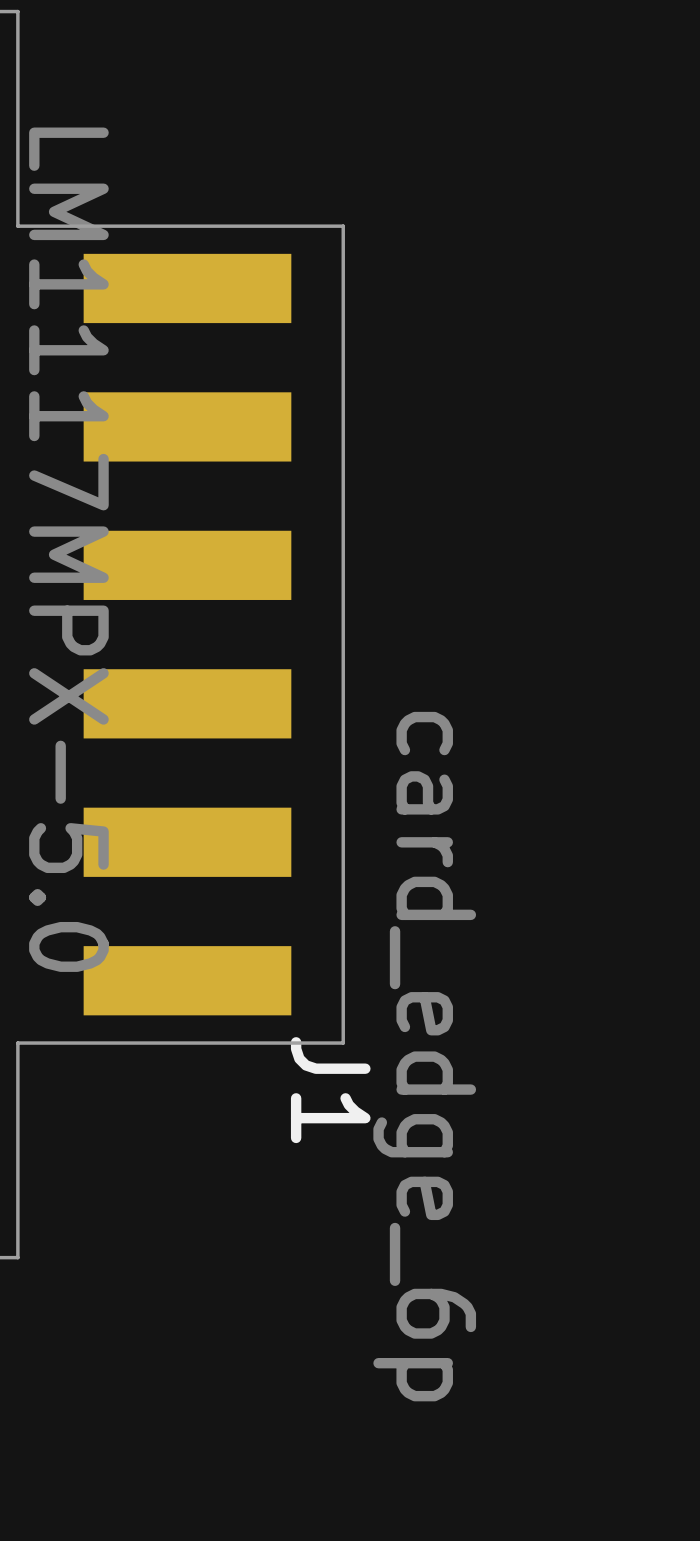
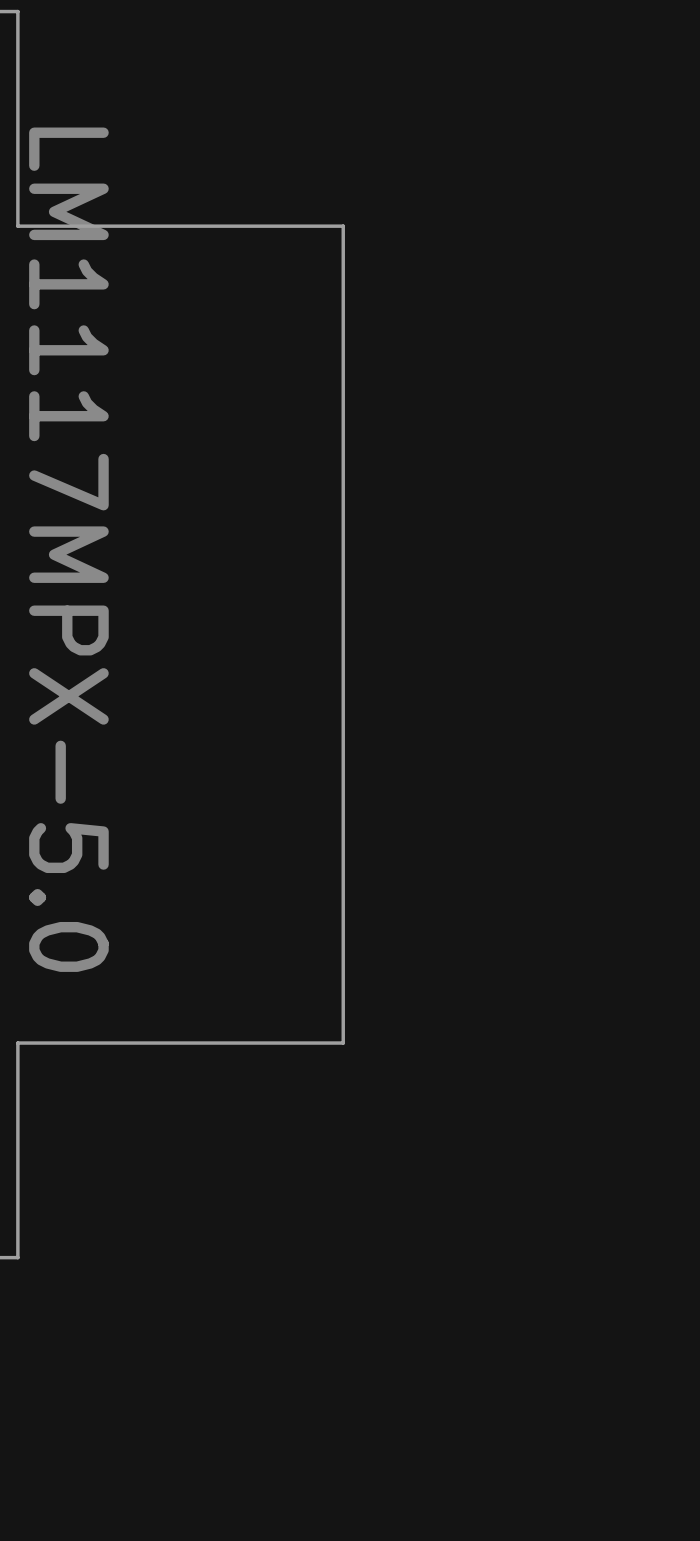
J1: card_edge_6p (187, 634) -> none

